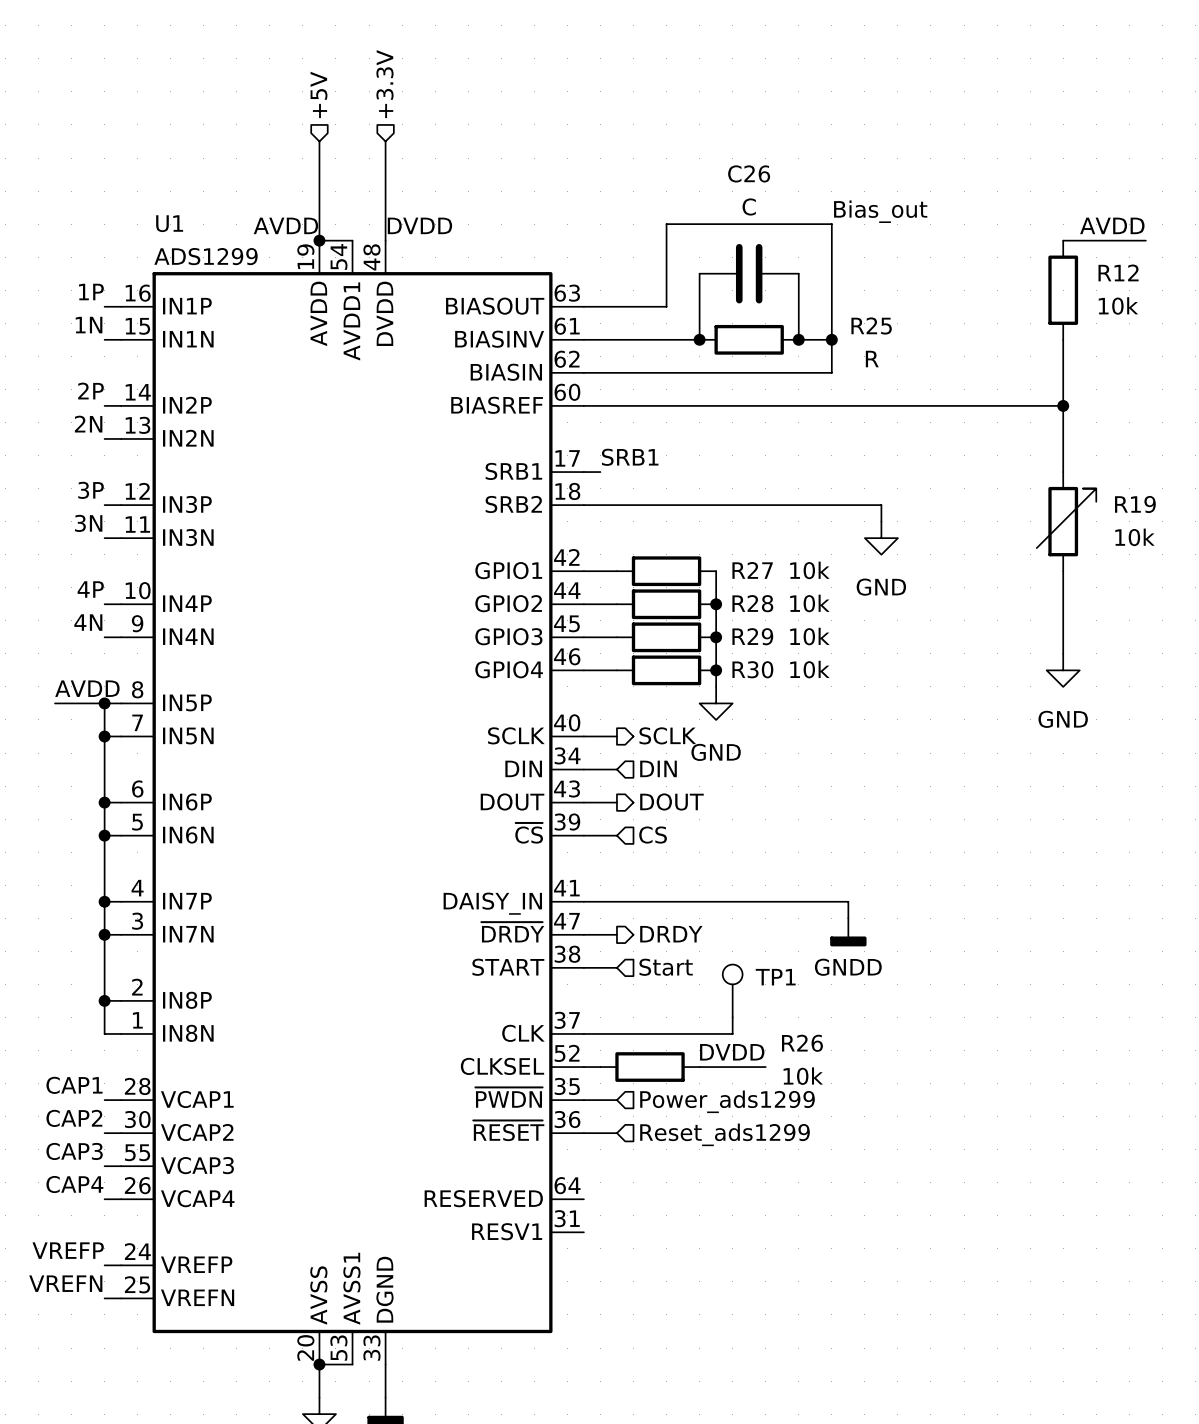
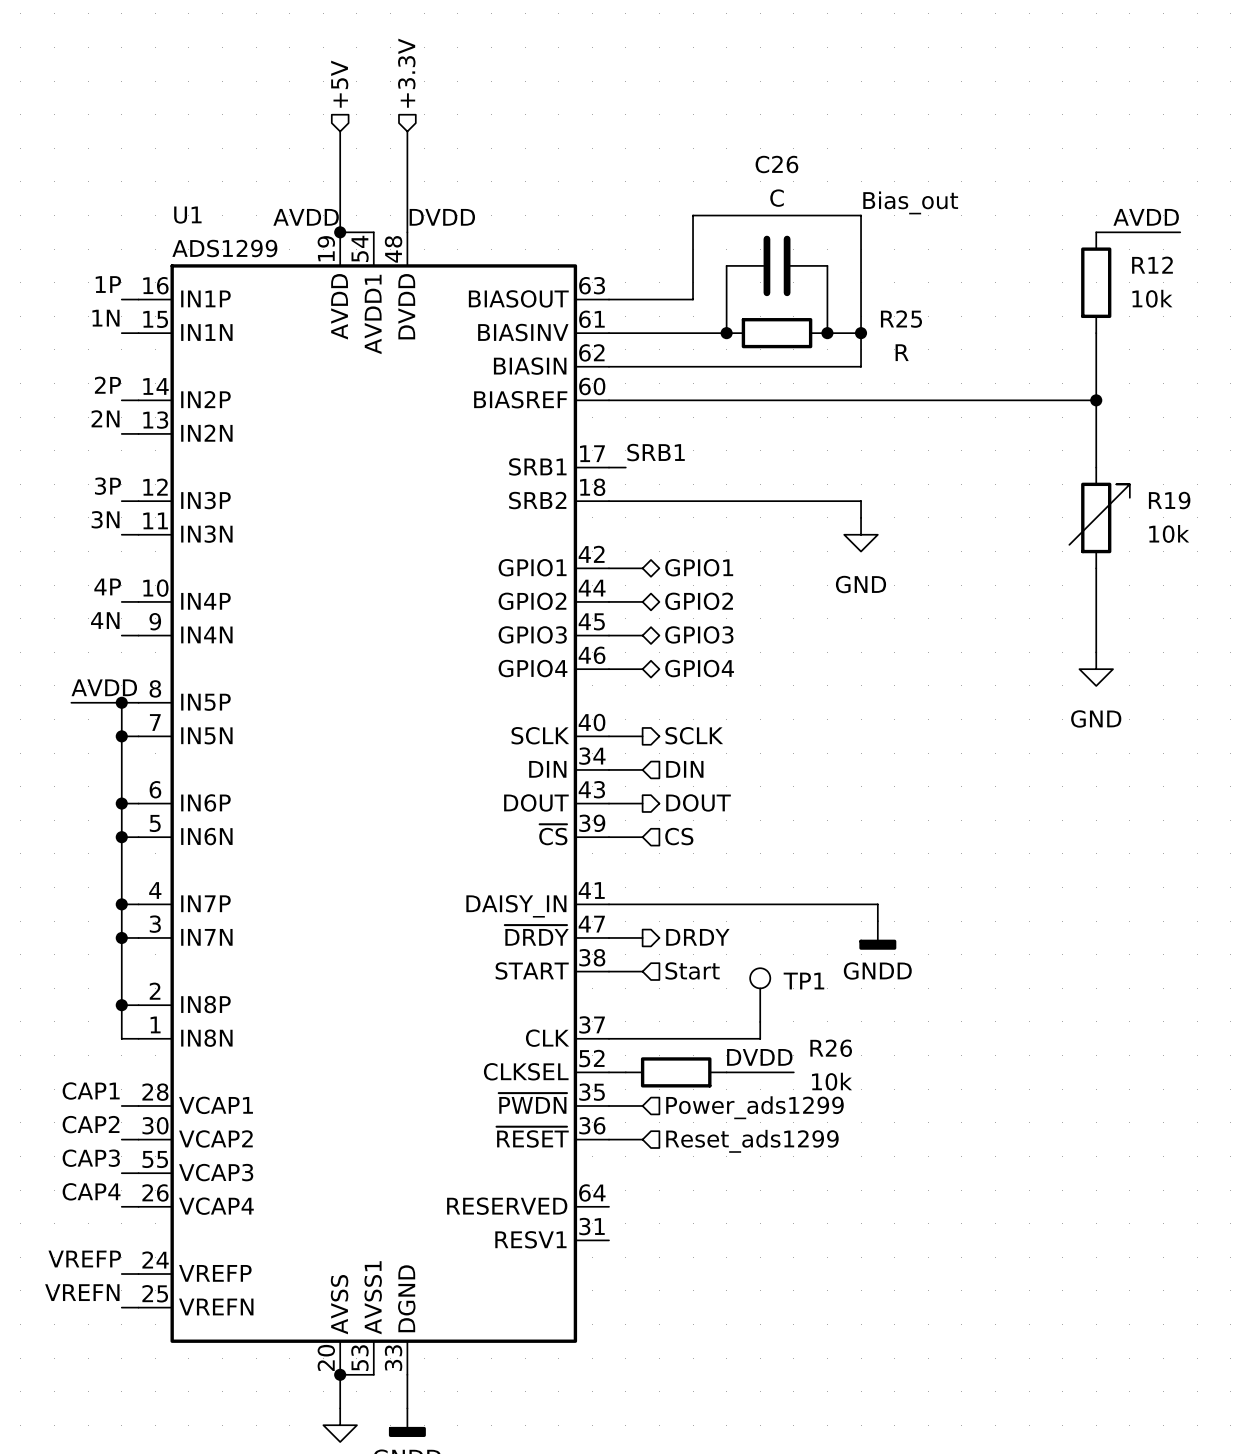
wire: (831, 505) (881, 505) (881, 521) -> (861, 501) (861, 517)
power symbol position: GND (881, 538) -> GND (861, 534)
hierarchical label: none -> GPIO1 (699, 567)
R27: 10k (666, 571) -> none
wire: (716, 571) (716, 686) -> none
hierarchical label: none -> GPIO2 (699, 601)
R28: 10k (666, 604) -> none
junction: (716, 604) -> none
hierarchical label: none -> GPIO3 (699, 634)
R29: 10k (666, 637) -> none
junction: (716, 637) -> none
hierarchical label: none -> GPIO4 (699, 668)
R30: 10k (666, 670) -> none
junction: (716, 670) -> none
power symbol: GND (716, 703) -> none

